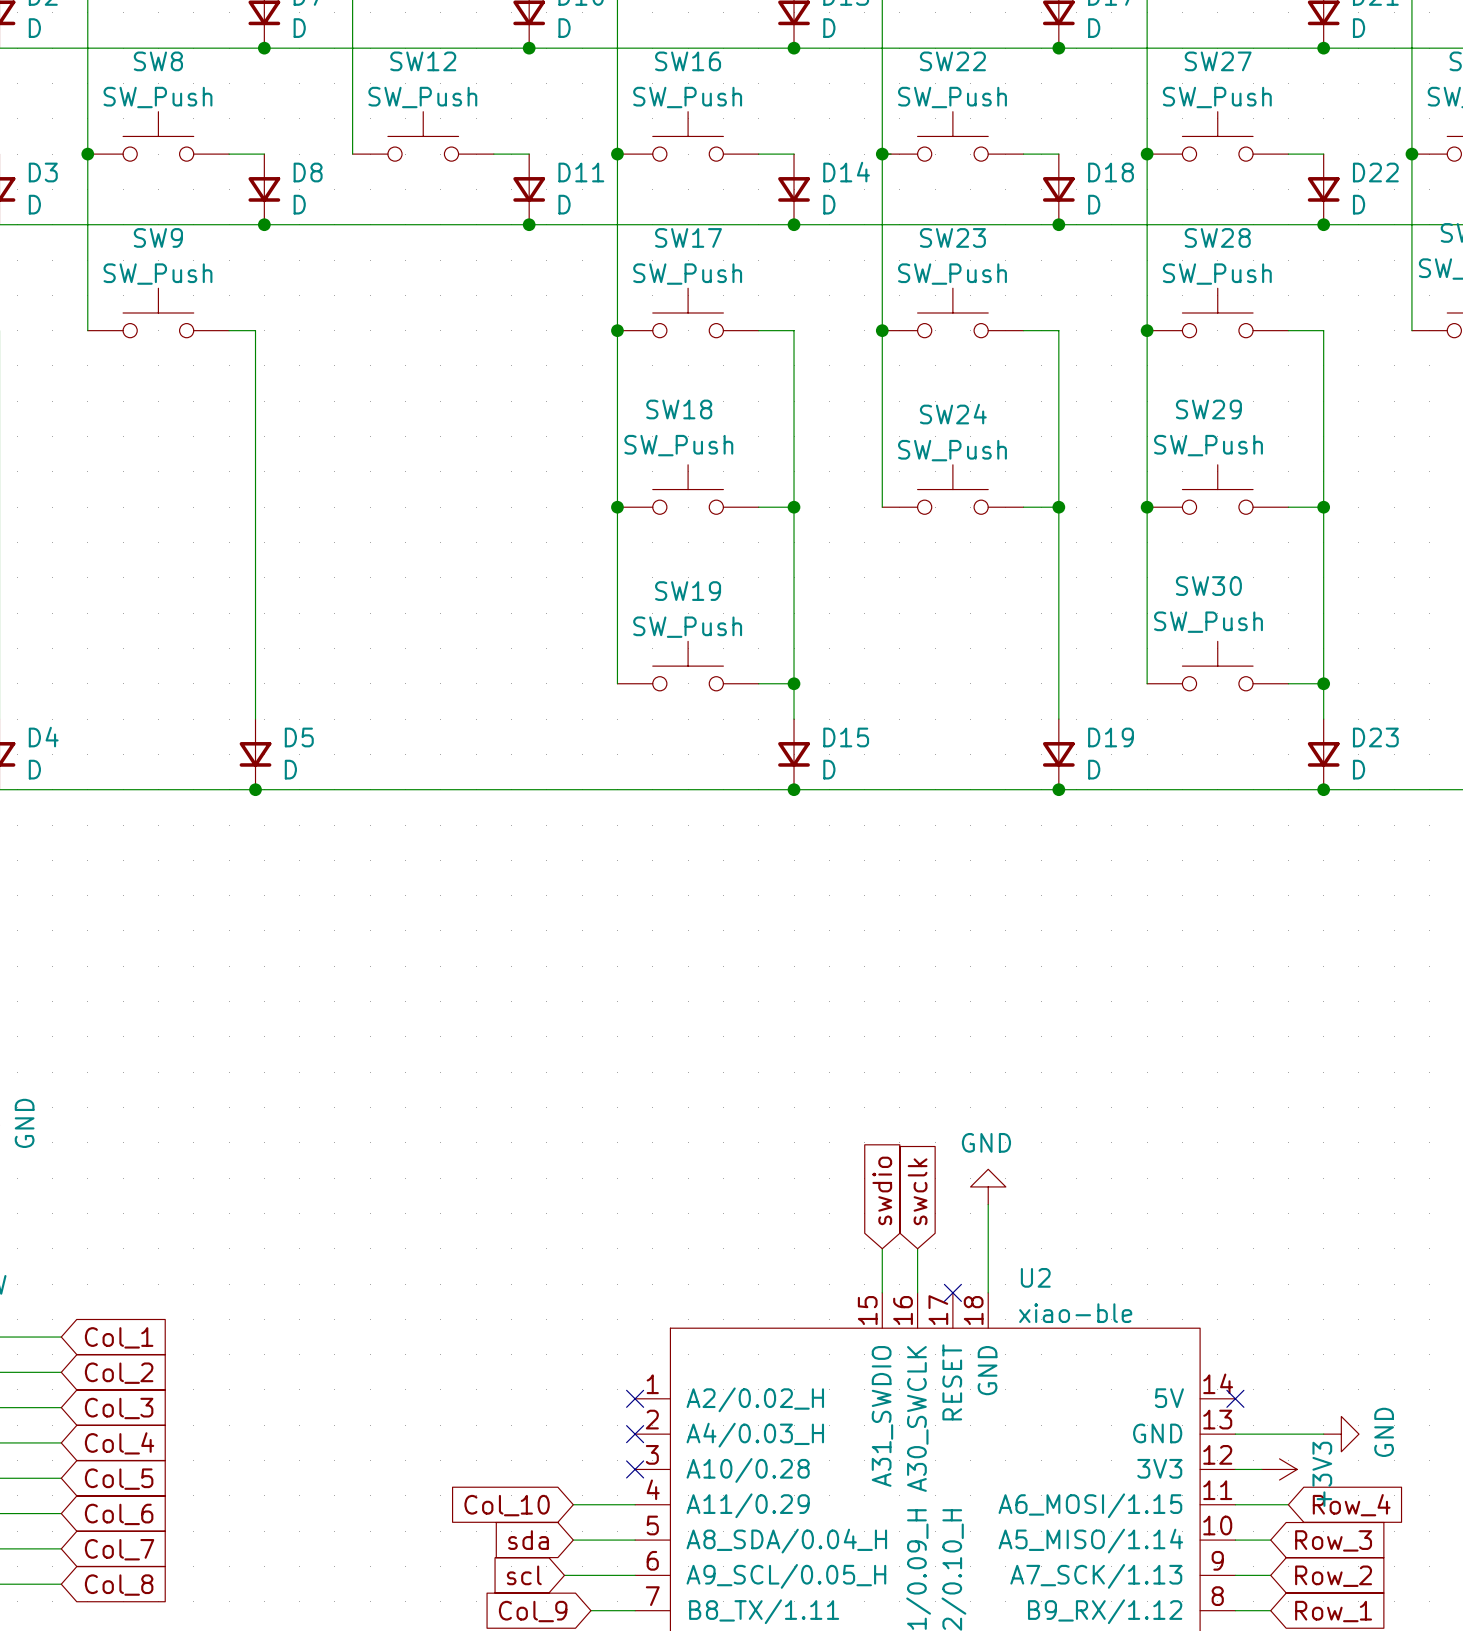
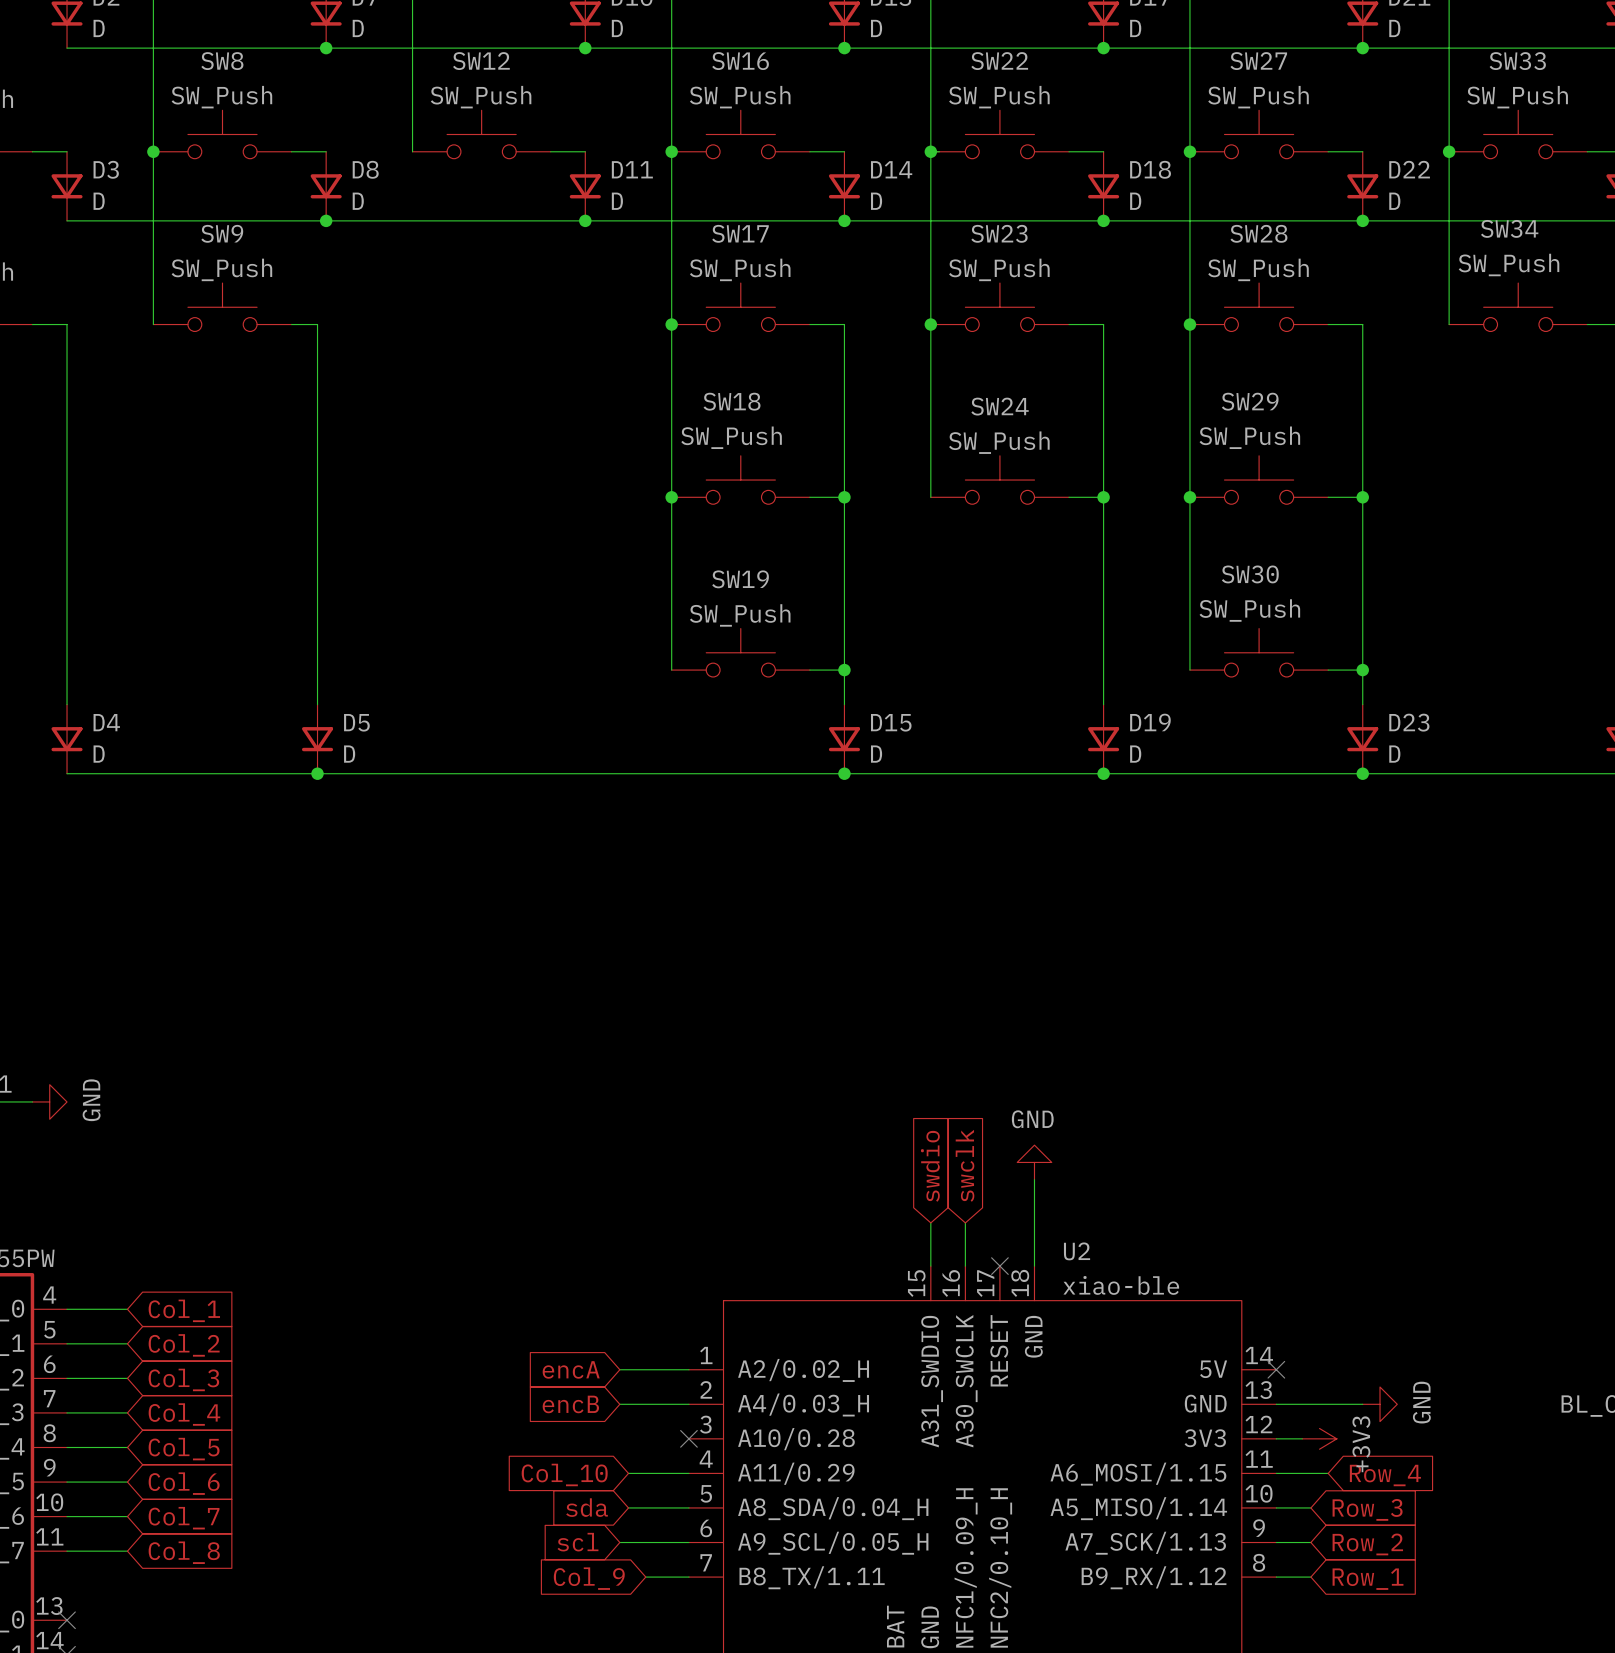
global label: none -> encA (571, 1369)
wire: none -> (619, 1369) (688, 1369)
no-connect mark: (635, 1398) -> none
global label: none -> encB (570, 1404)
wire: none -> (619, 1404) (688, 1404)
no-connect mark: (635, 1434) -> none

